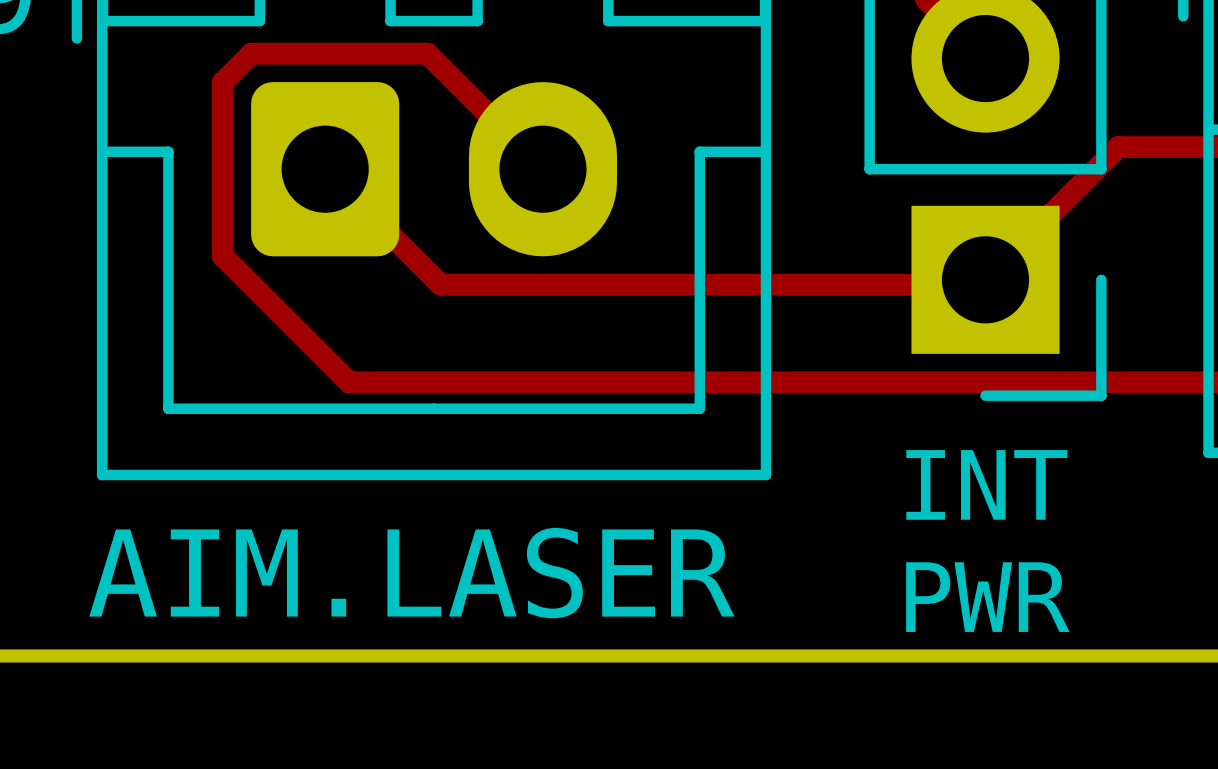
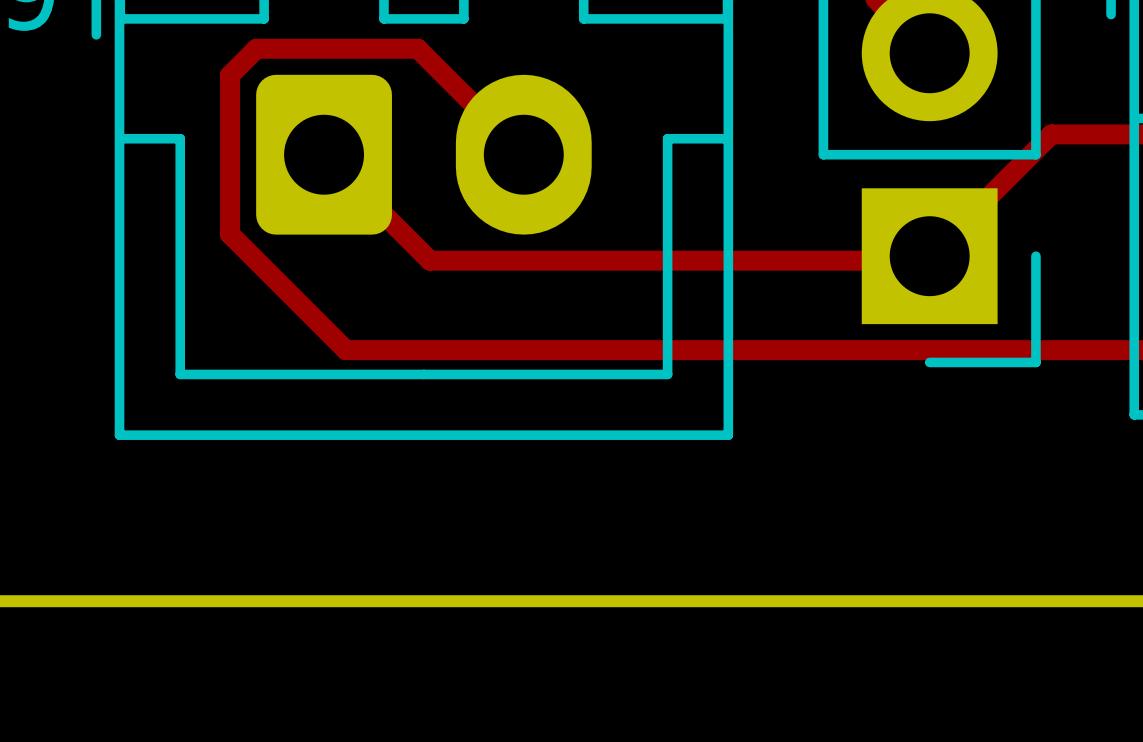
text: INT (986, 484) -> none
text: AIM.LASER (411, 573) -> none
text: PWR (987, 597) -> none

